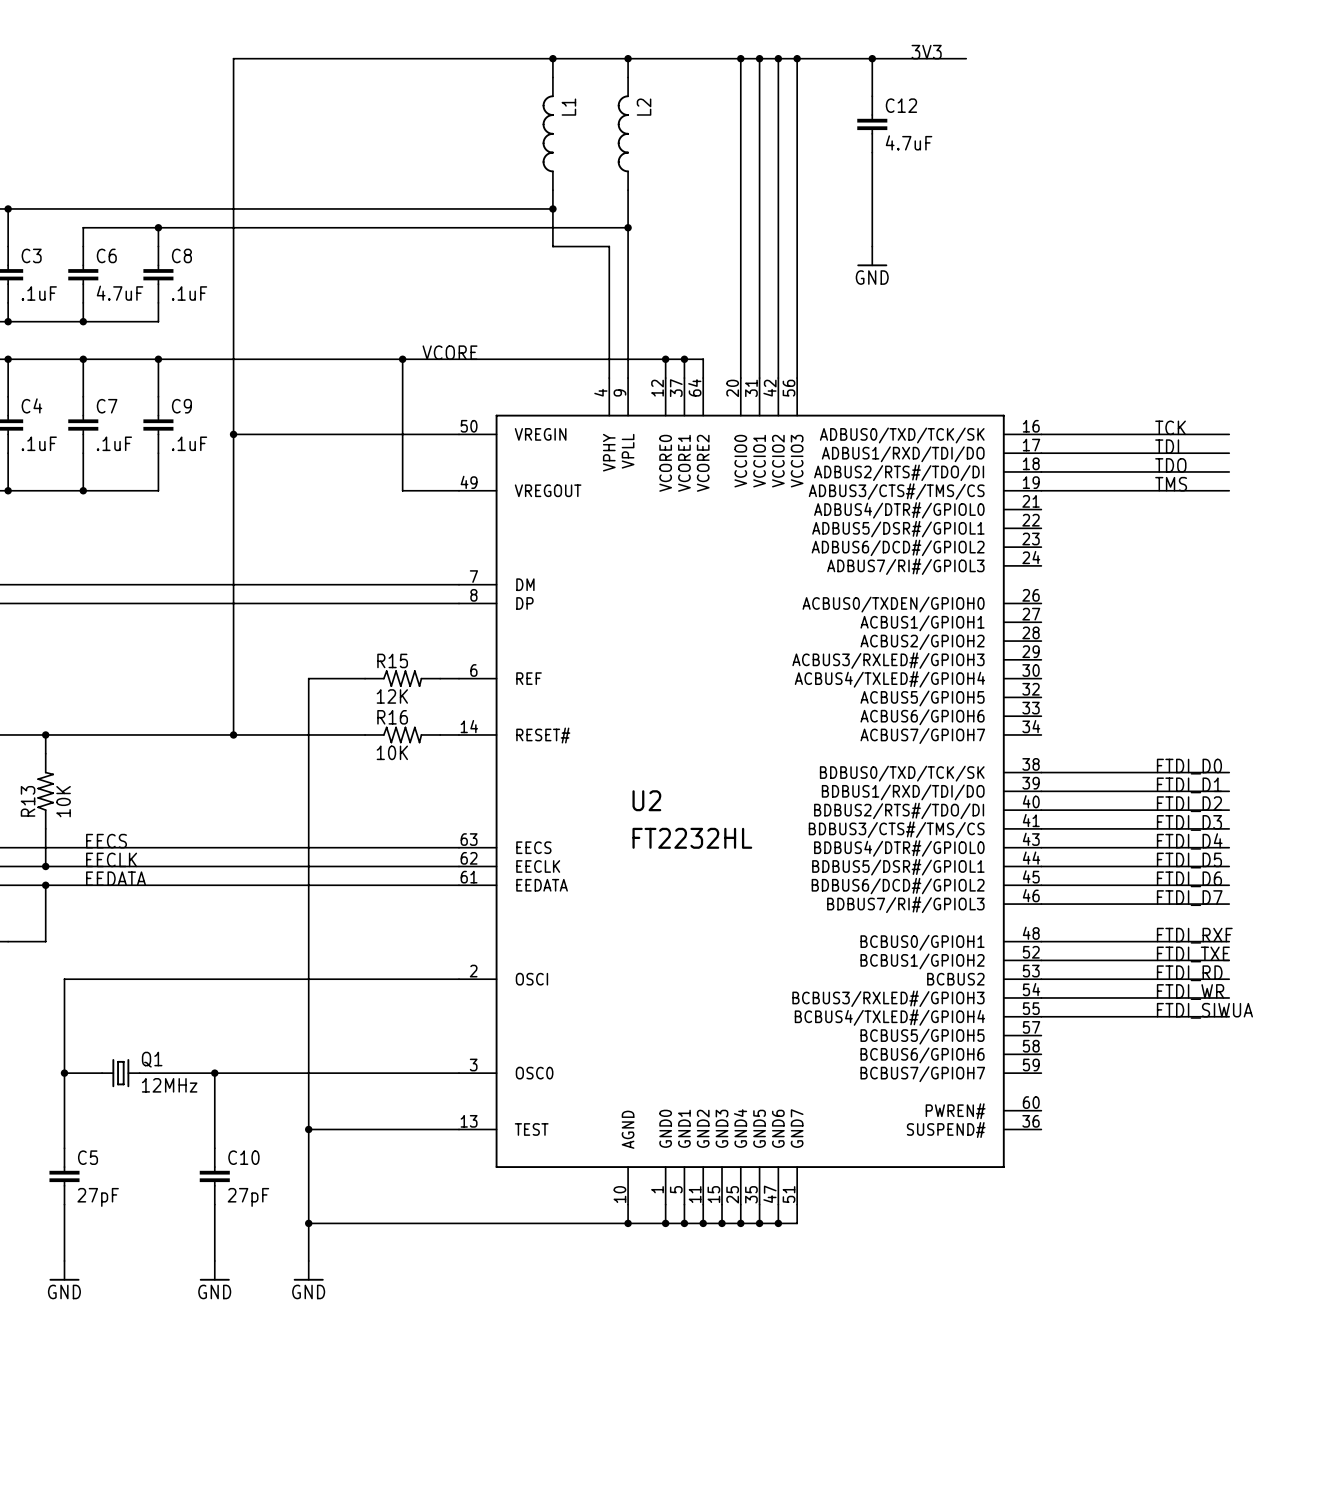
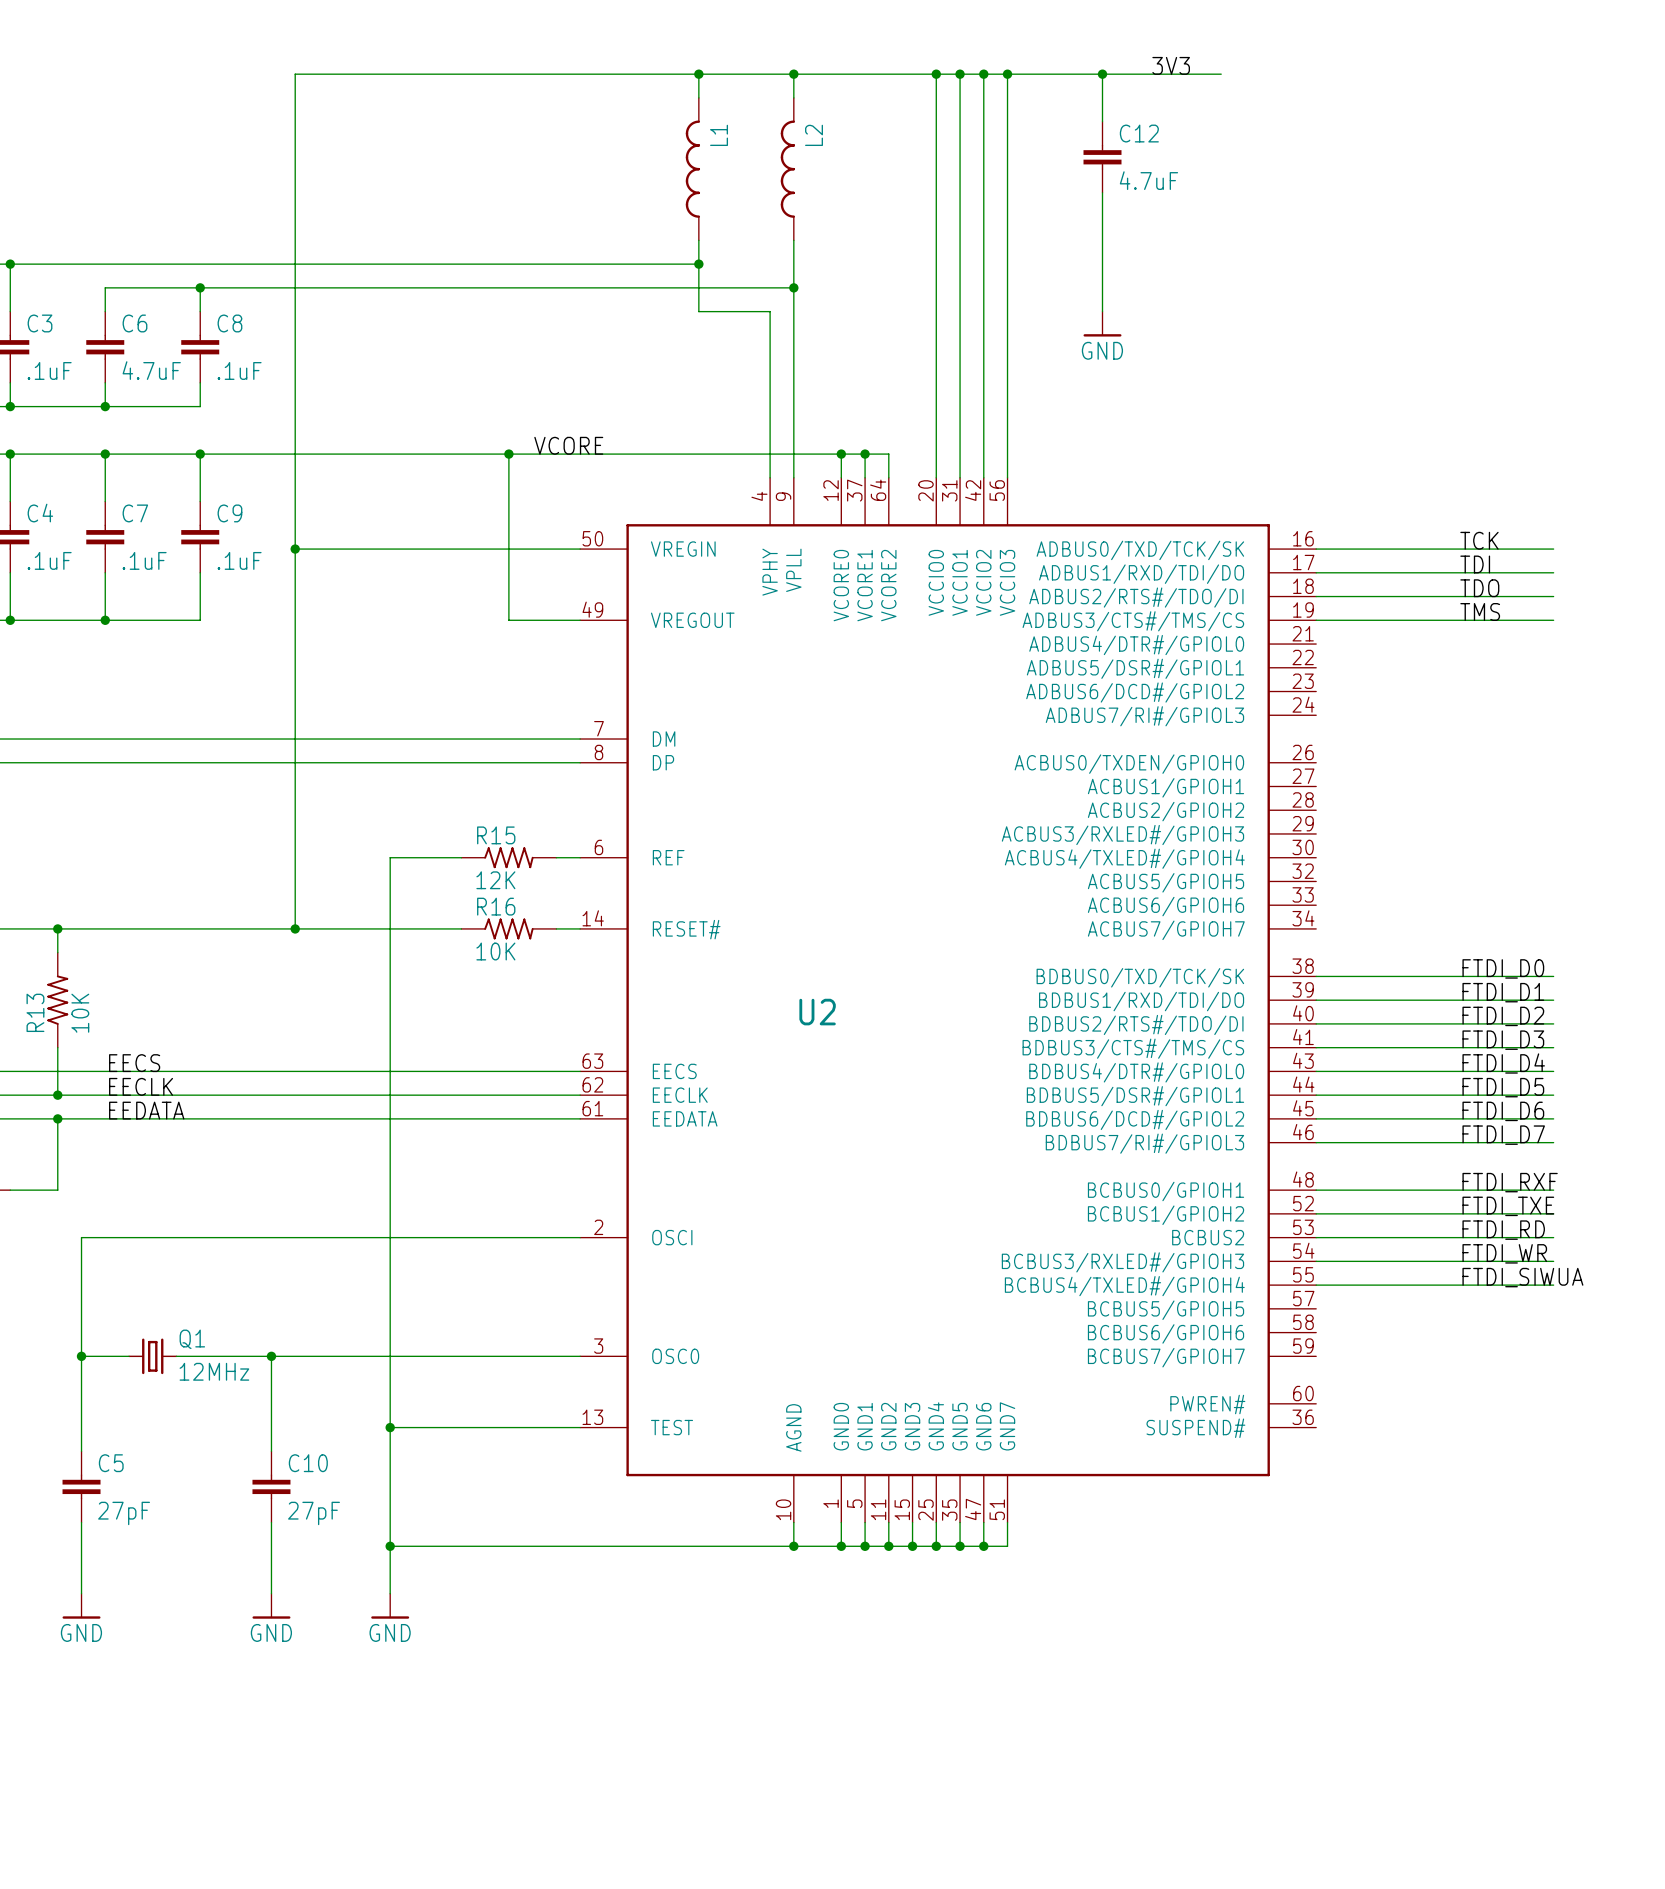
U2 value: FT2232HL (692, 838) -> none

